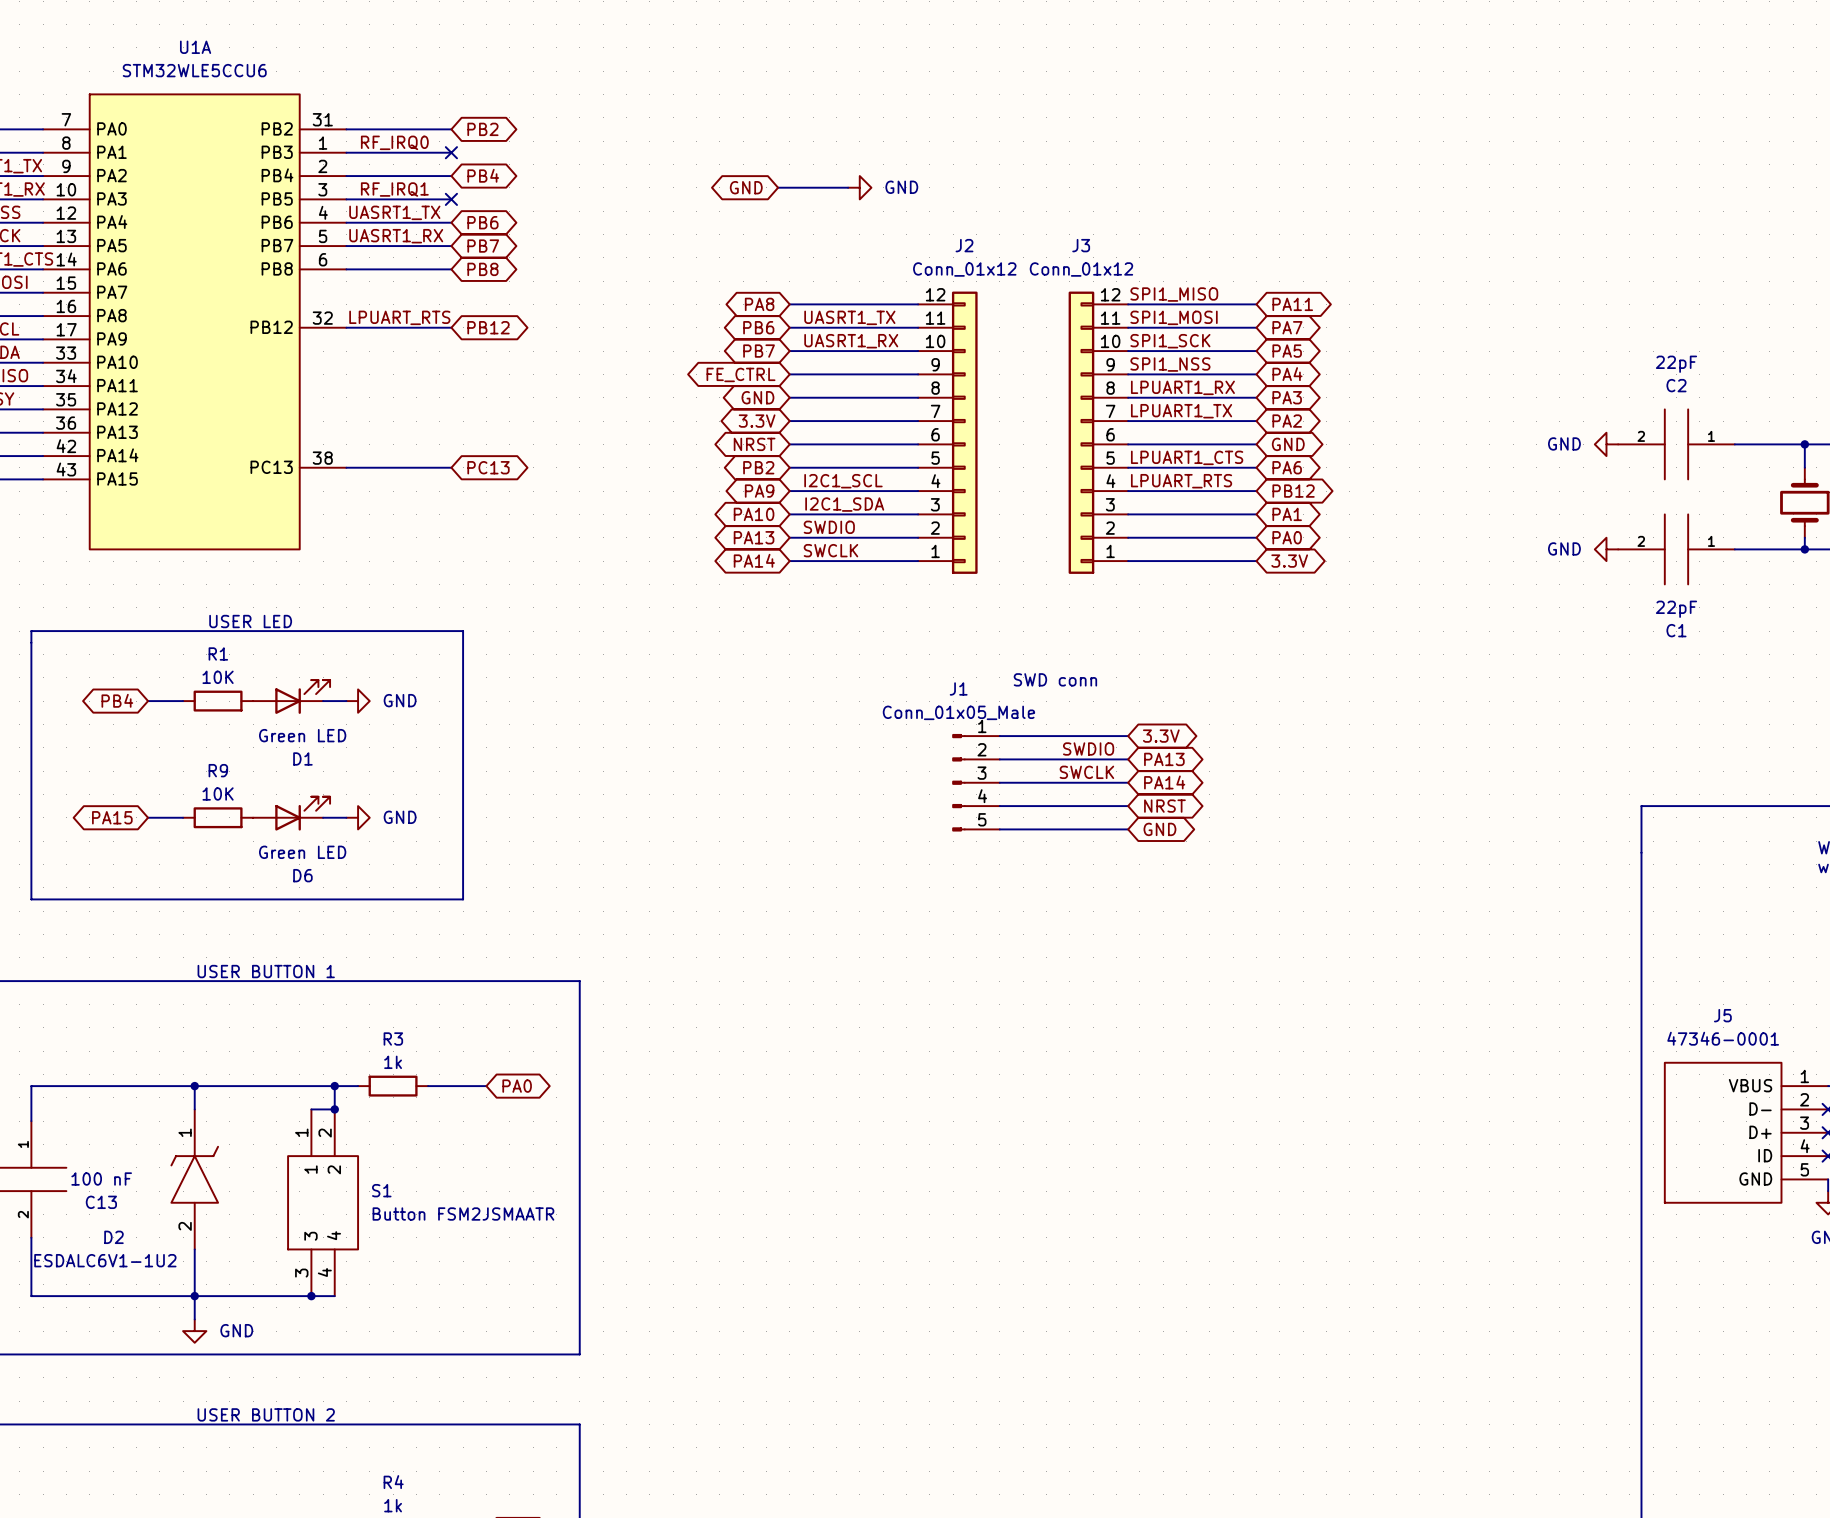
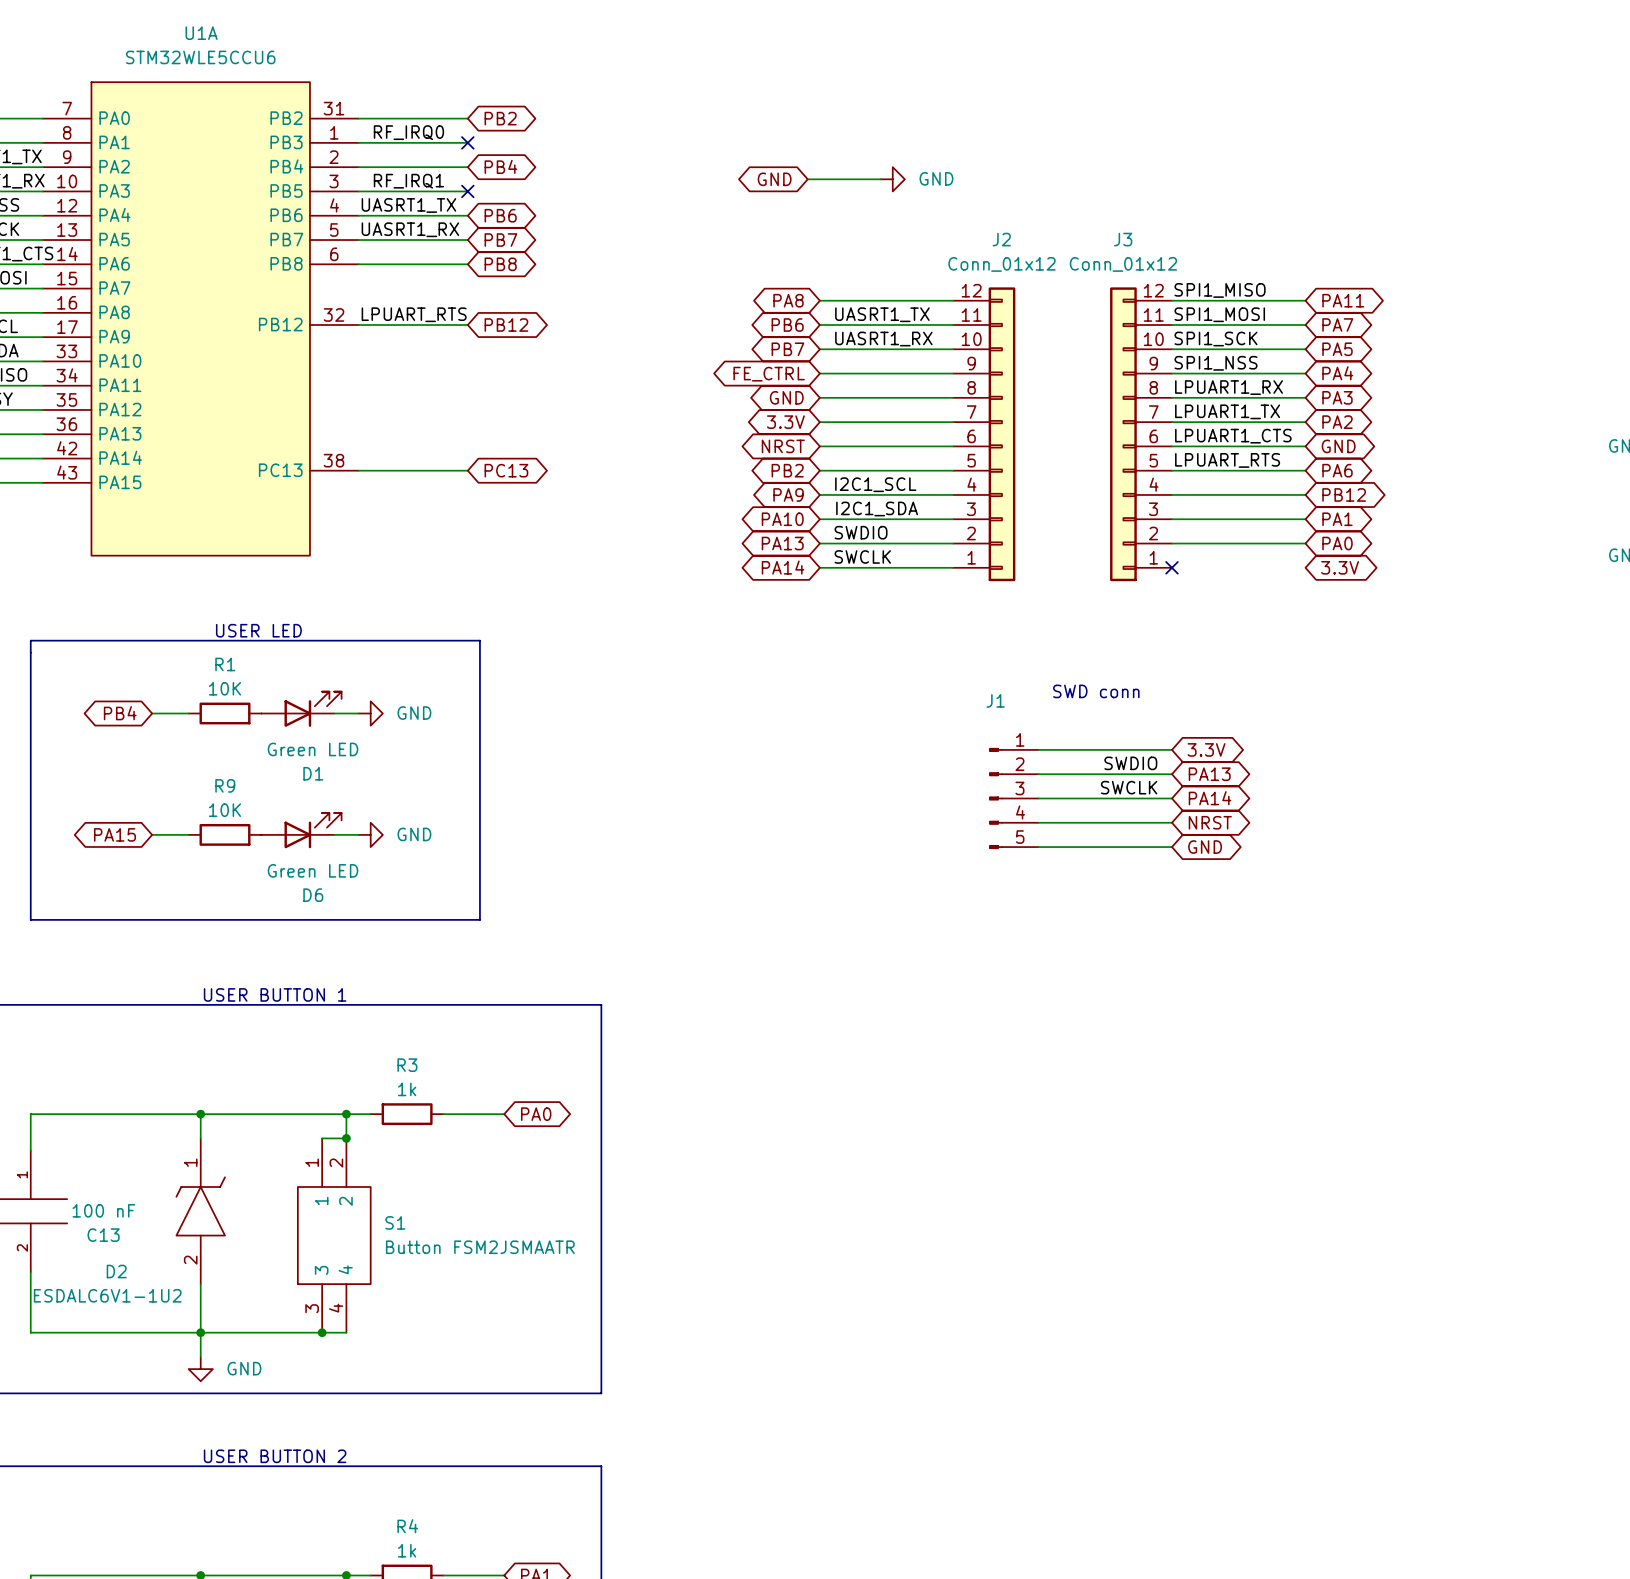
label: none -> LPUART1_CTS (1233, 436)
label: LPUART1_CTS (1187, 457) -> LPUART_RTS (1227, 460)
label: LPUART_RTS (1181, 481) -> none
wire: (1128, 561) (1256, 561) -> none
no-connect mark: none -> (1171, 567)
J1 value: Conn_01x05_Male (958, 712) -> none

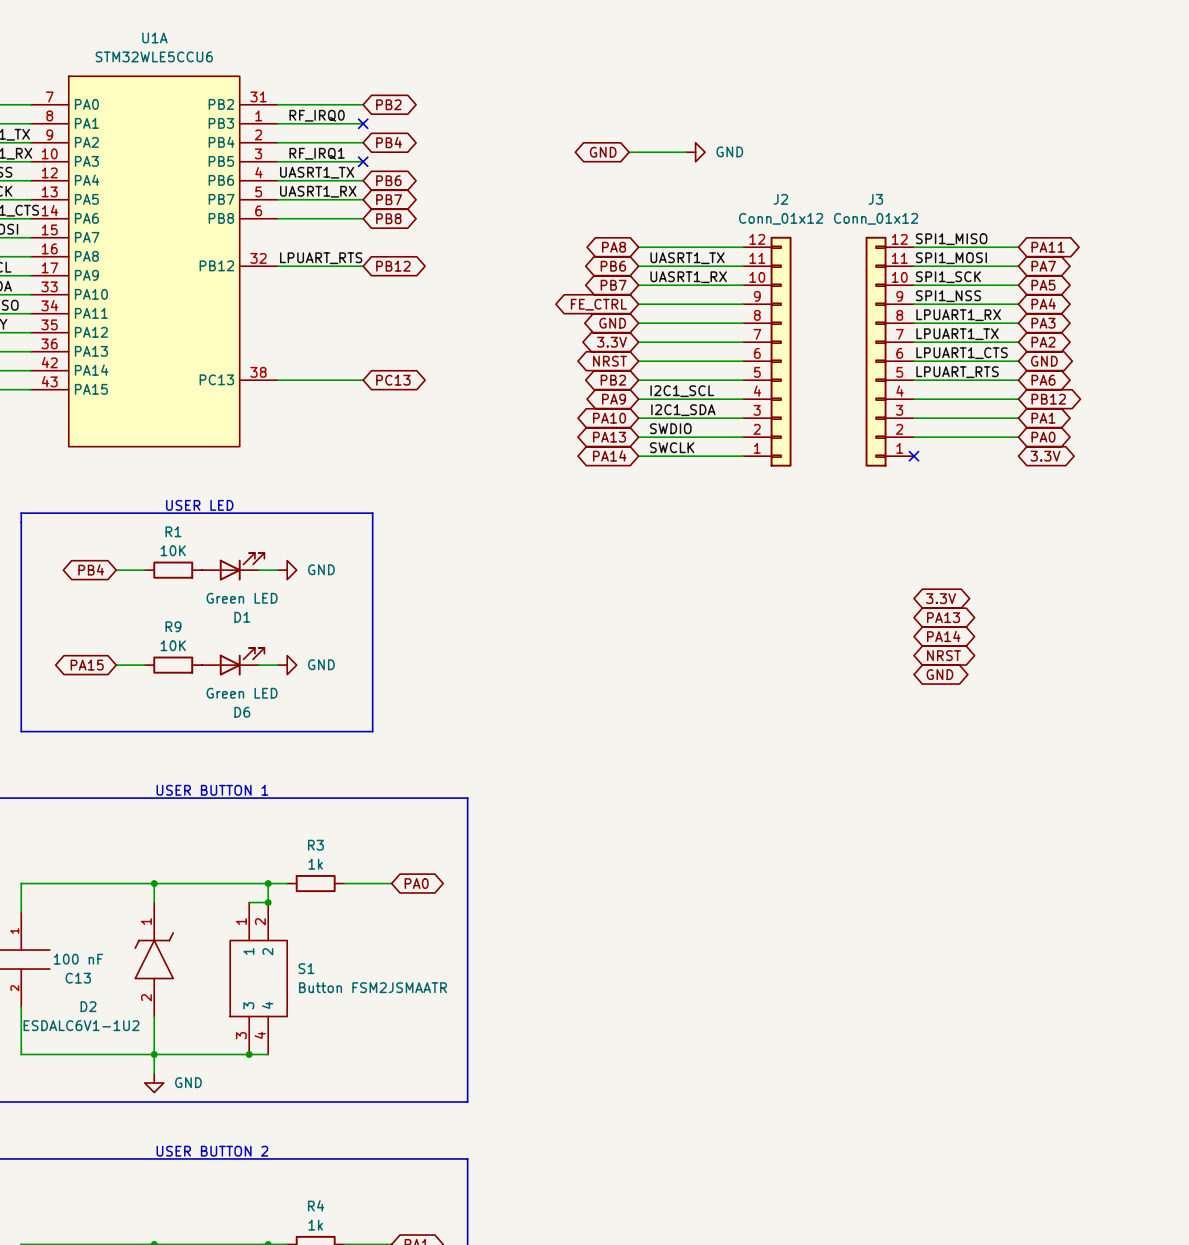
text: SWD conn (1096, 691) -> none
wire: (1038, 749) (1171, 749) -> none
label: SWDIO (1130, 763) -> none
wire: (1038, 774) (1171, 774) -> none
label: SWCLK (1129, 787) -> none
J1: (1013, 798) -> none
wire: (1038, 798) (1171, 798) -> none
wire: (1038, 822) (1171, 822) -> none
wire: (1038, 847) (1171, 847) -> none

